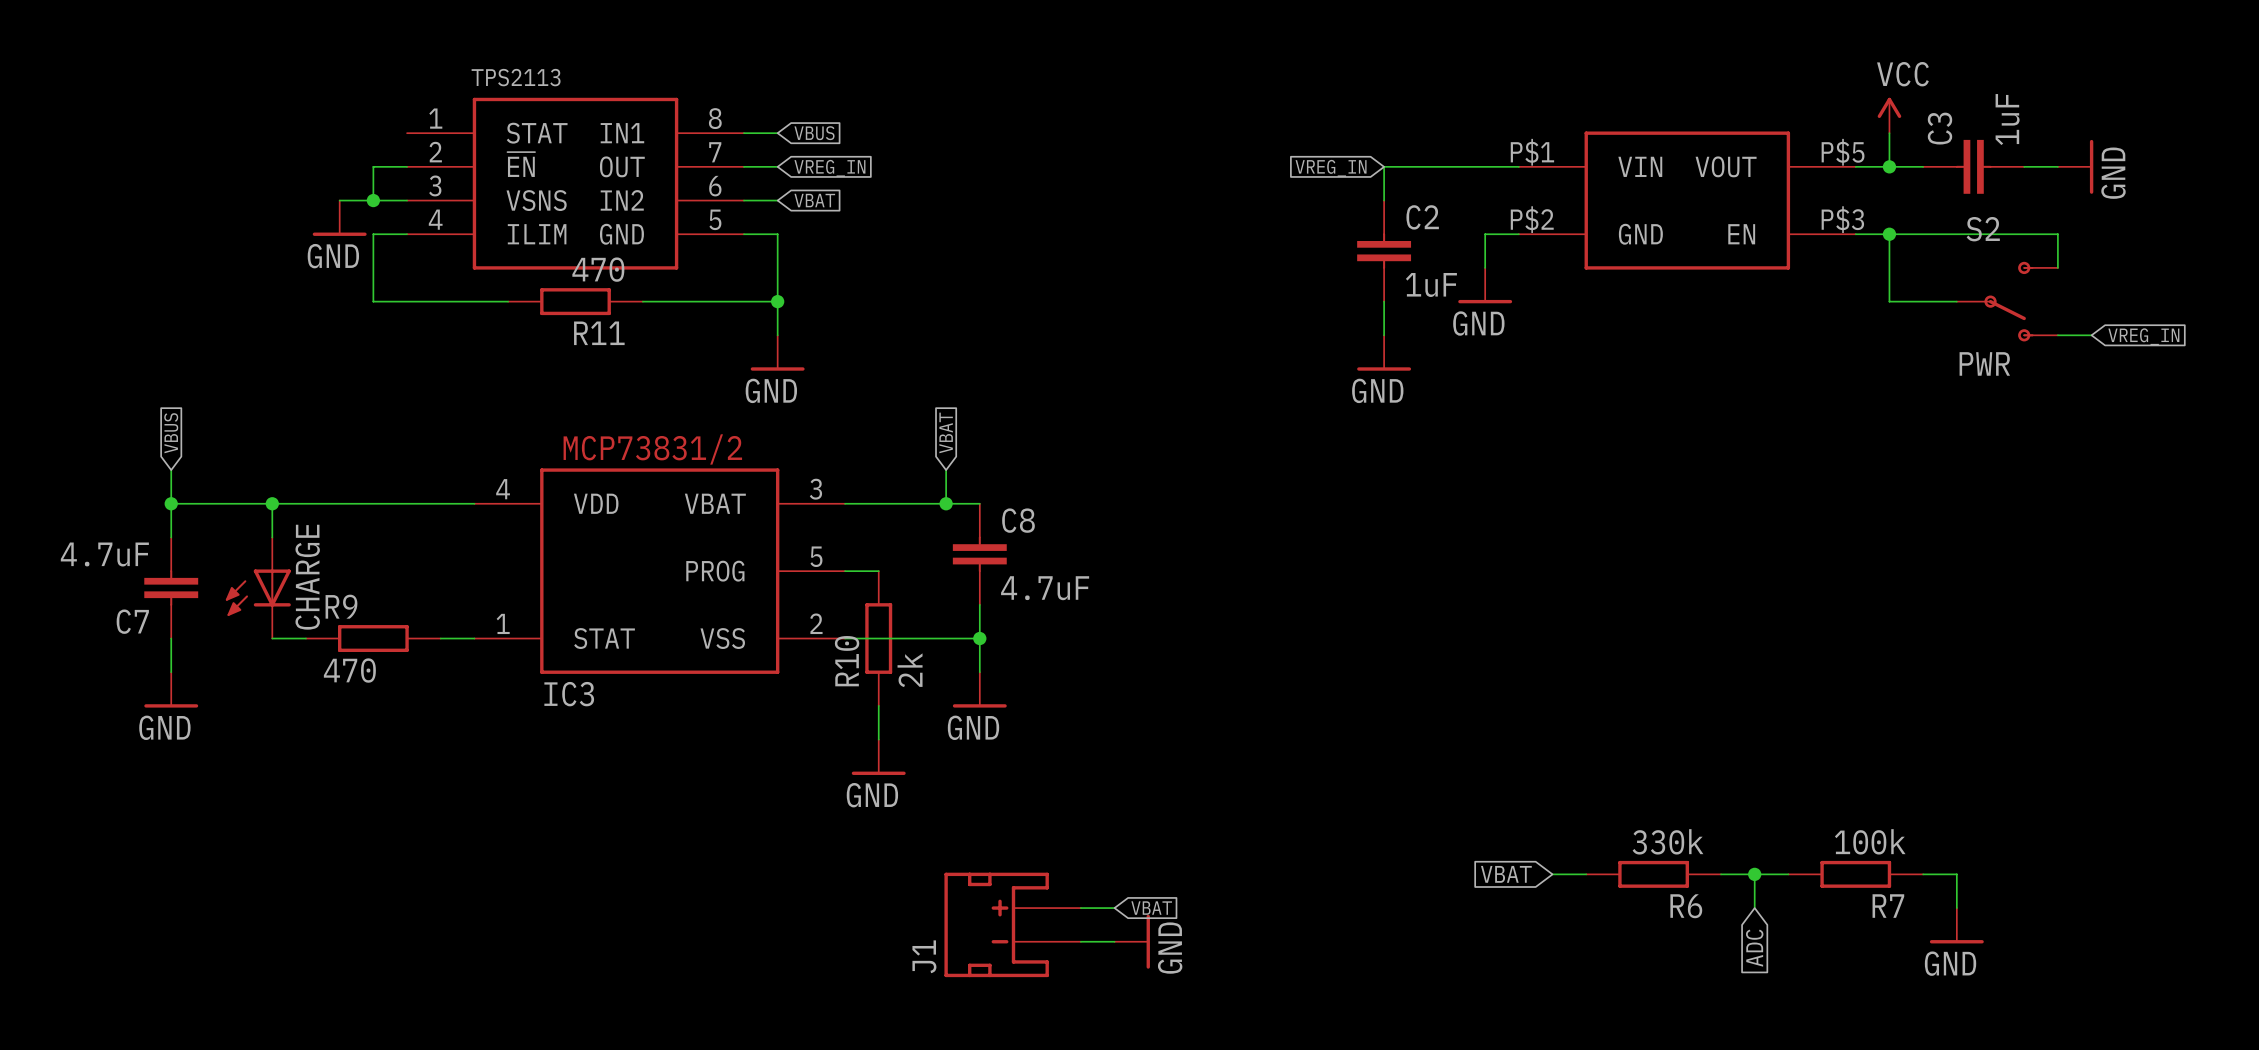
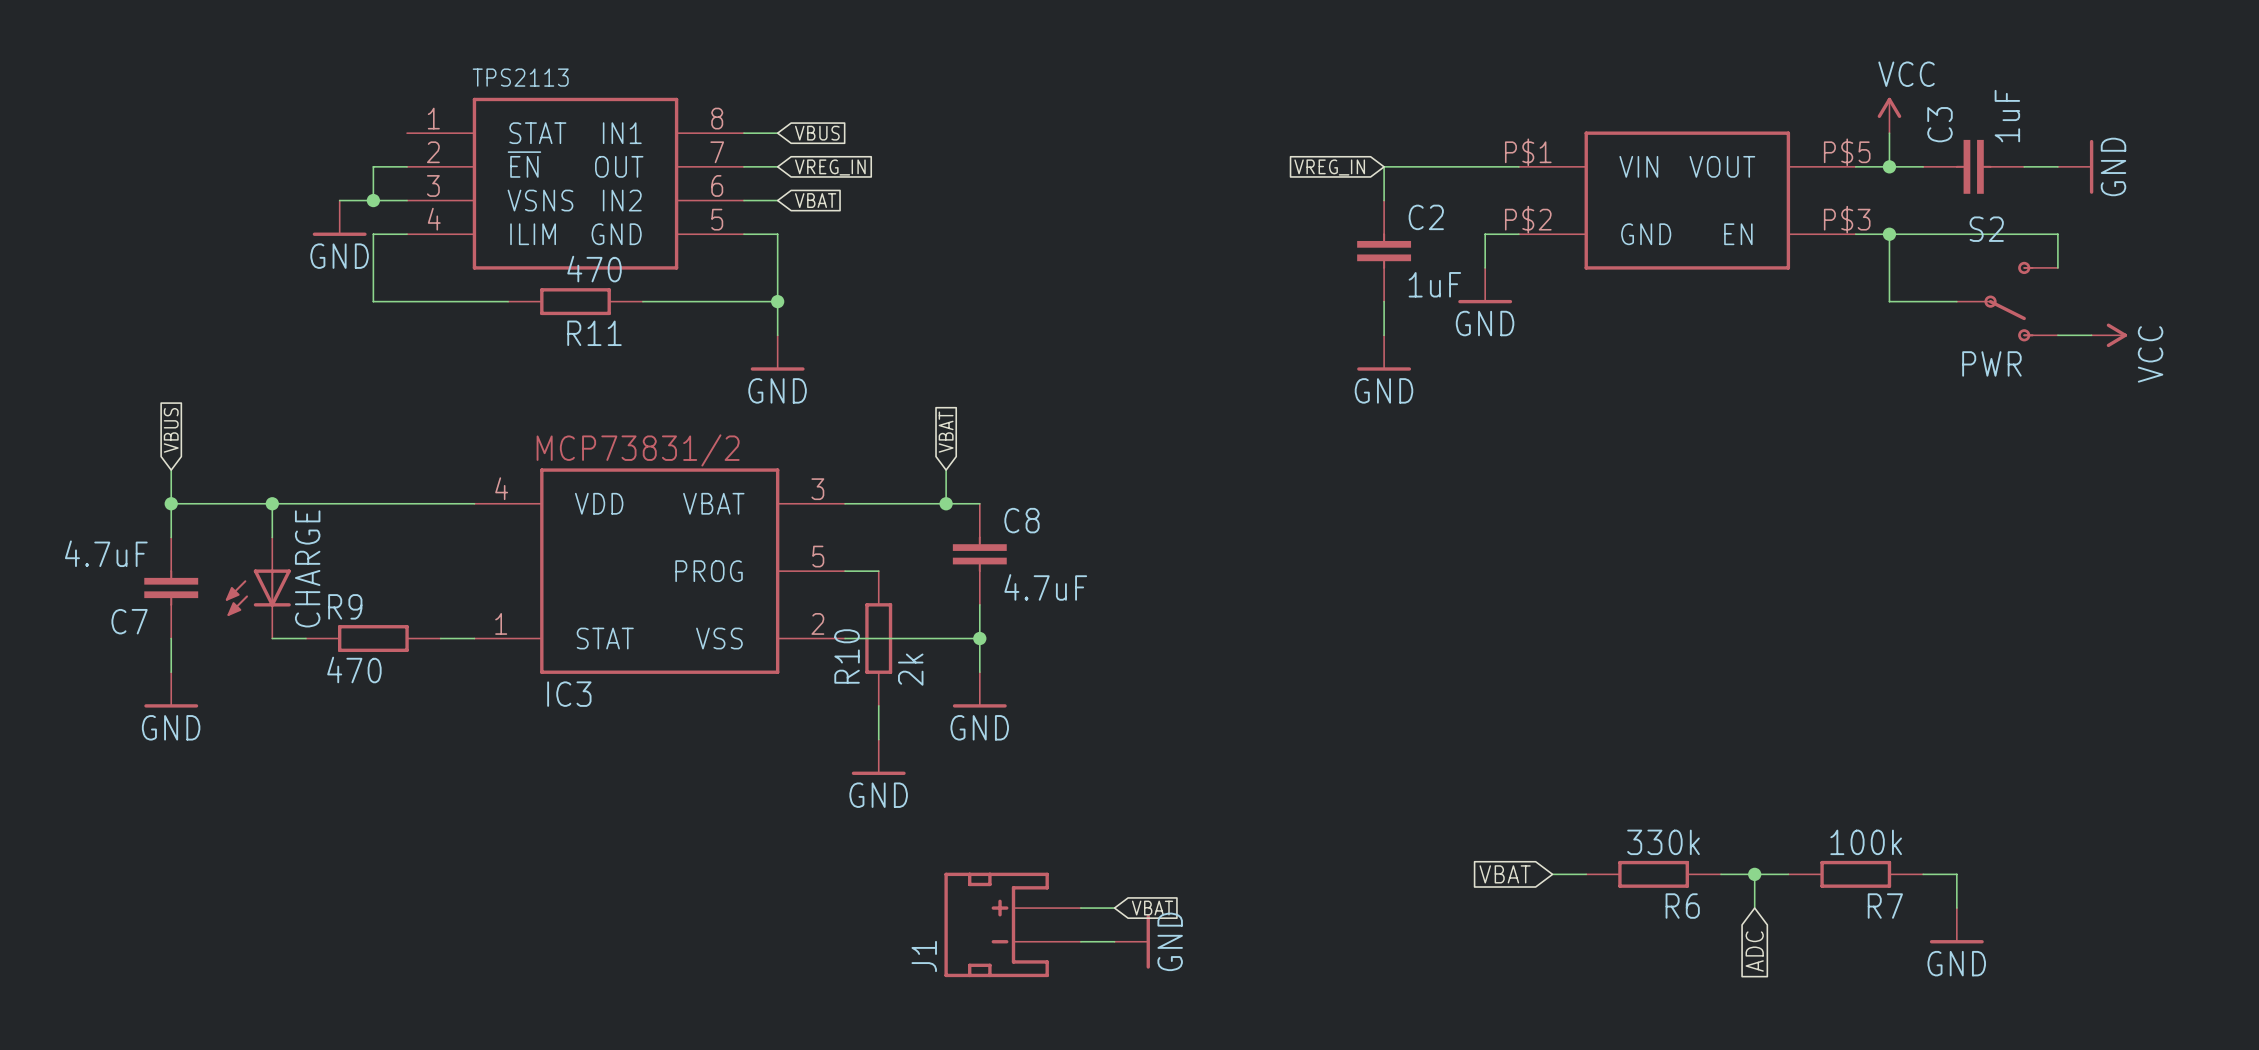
power symbol: none -> VCC (2109, 335)
global label: VREG_IN (2143, 336) -> none

